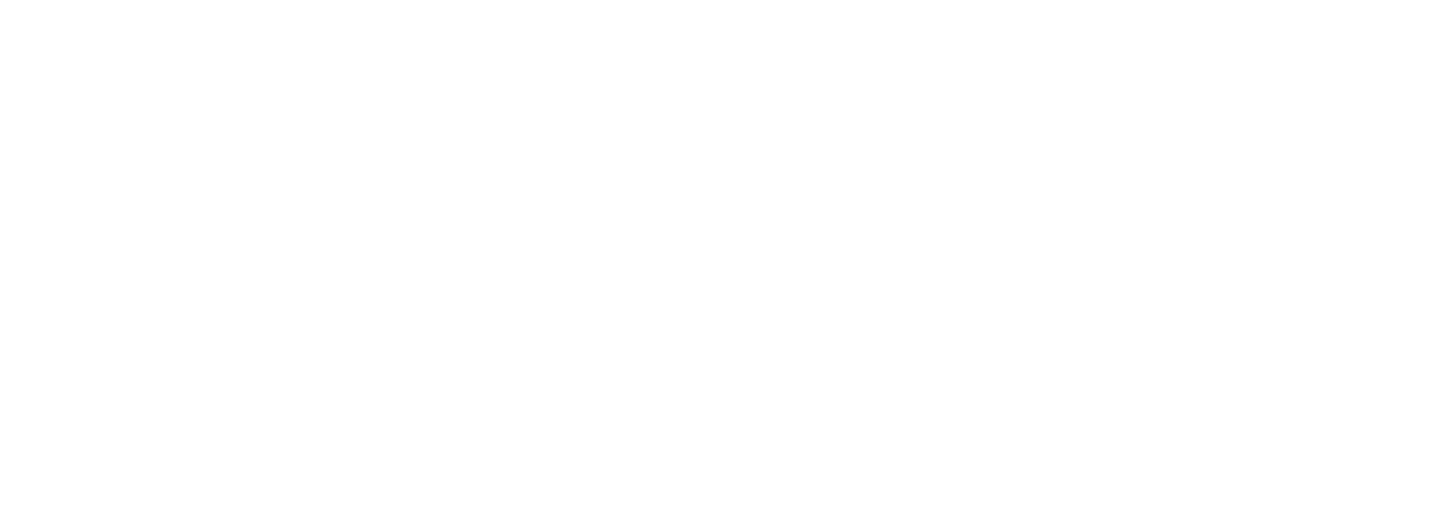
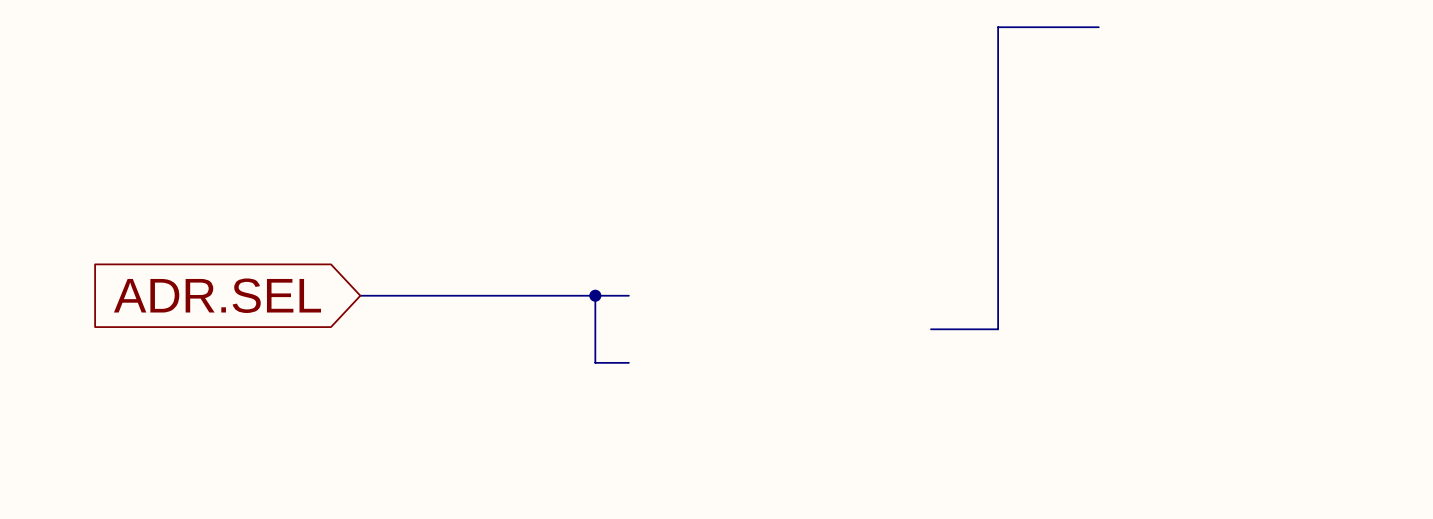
wire: none -> (1098, 27) (998, 27) (998, 329) (930, 329)
global label: none -> ADR.SEL (217, 295)
wire: none -> (360, 295) (628, 295)
wire: none -> (595, 295) (595, 362) (628, 362)
junction: none -> (595, 295)

